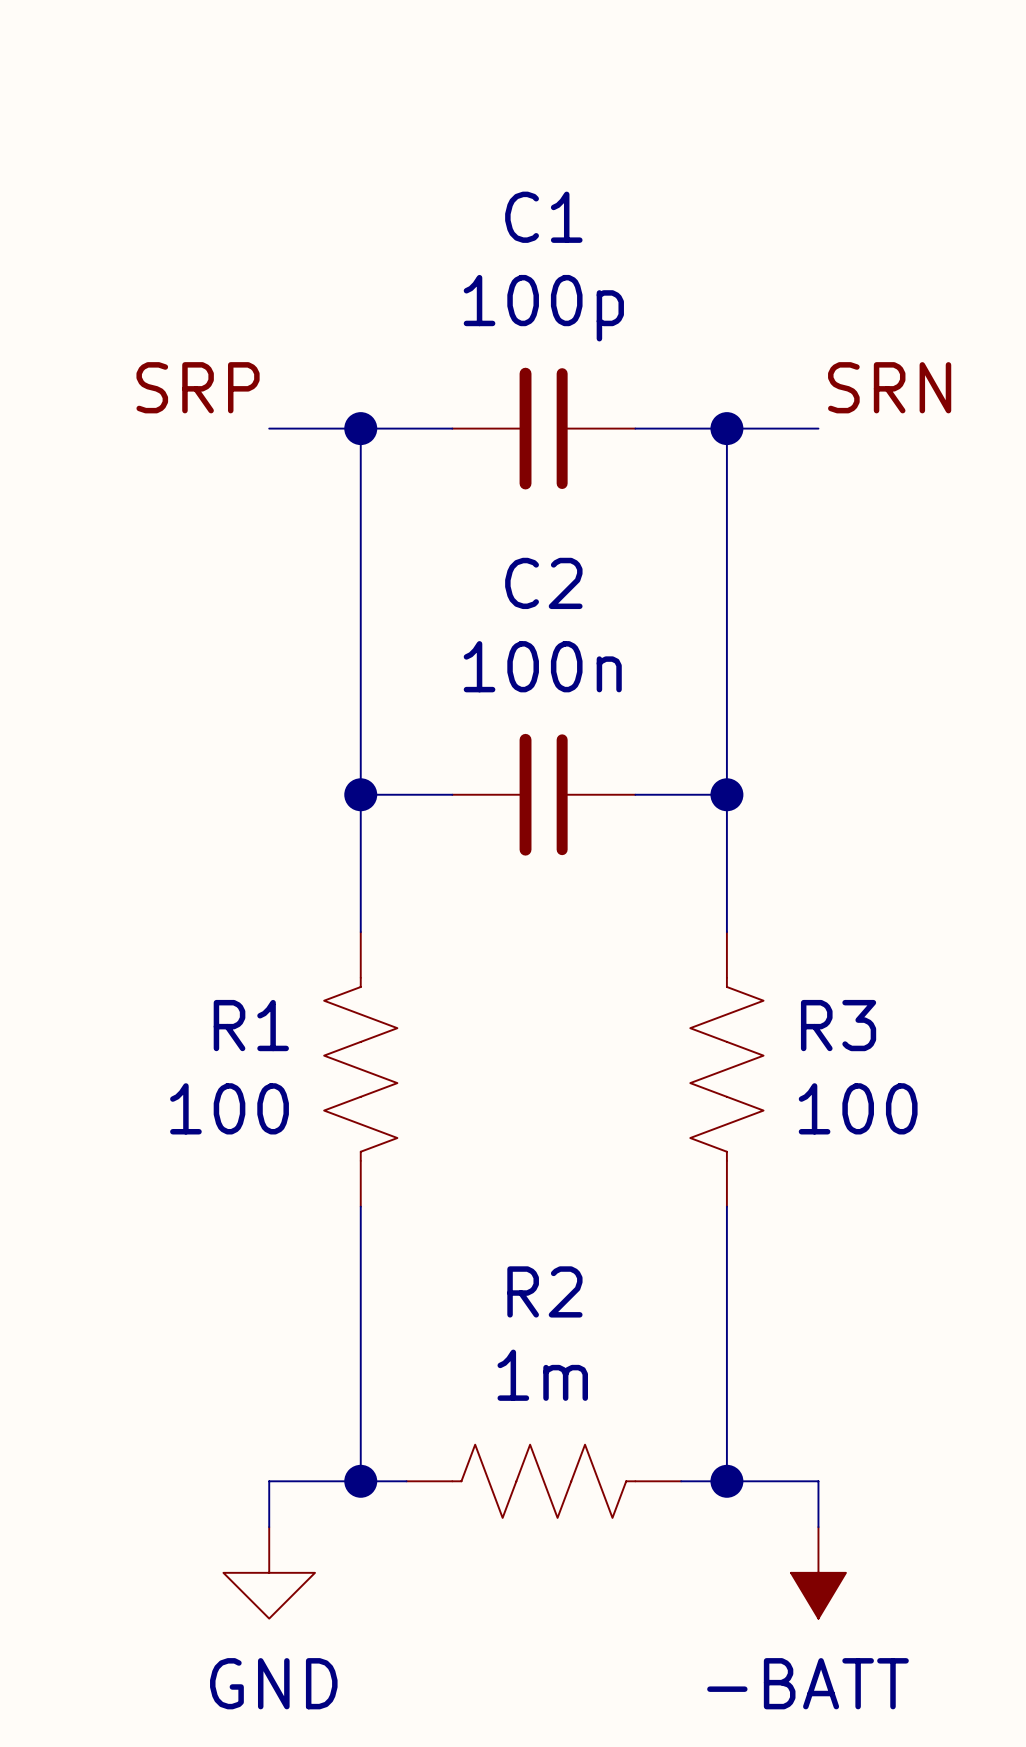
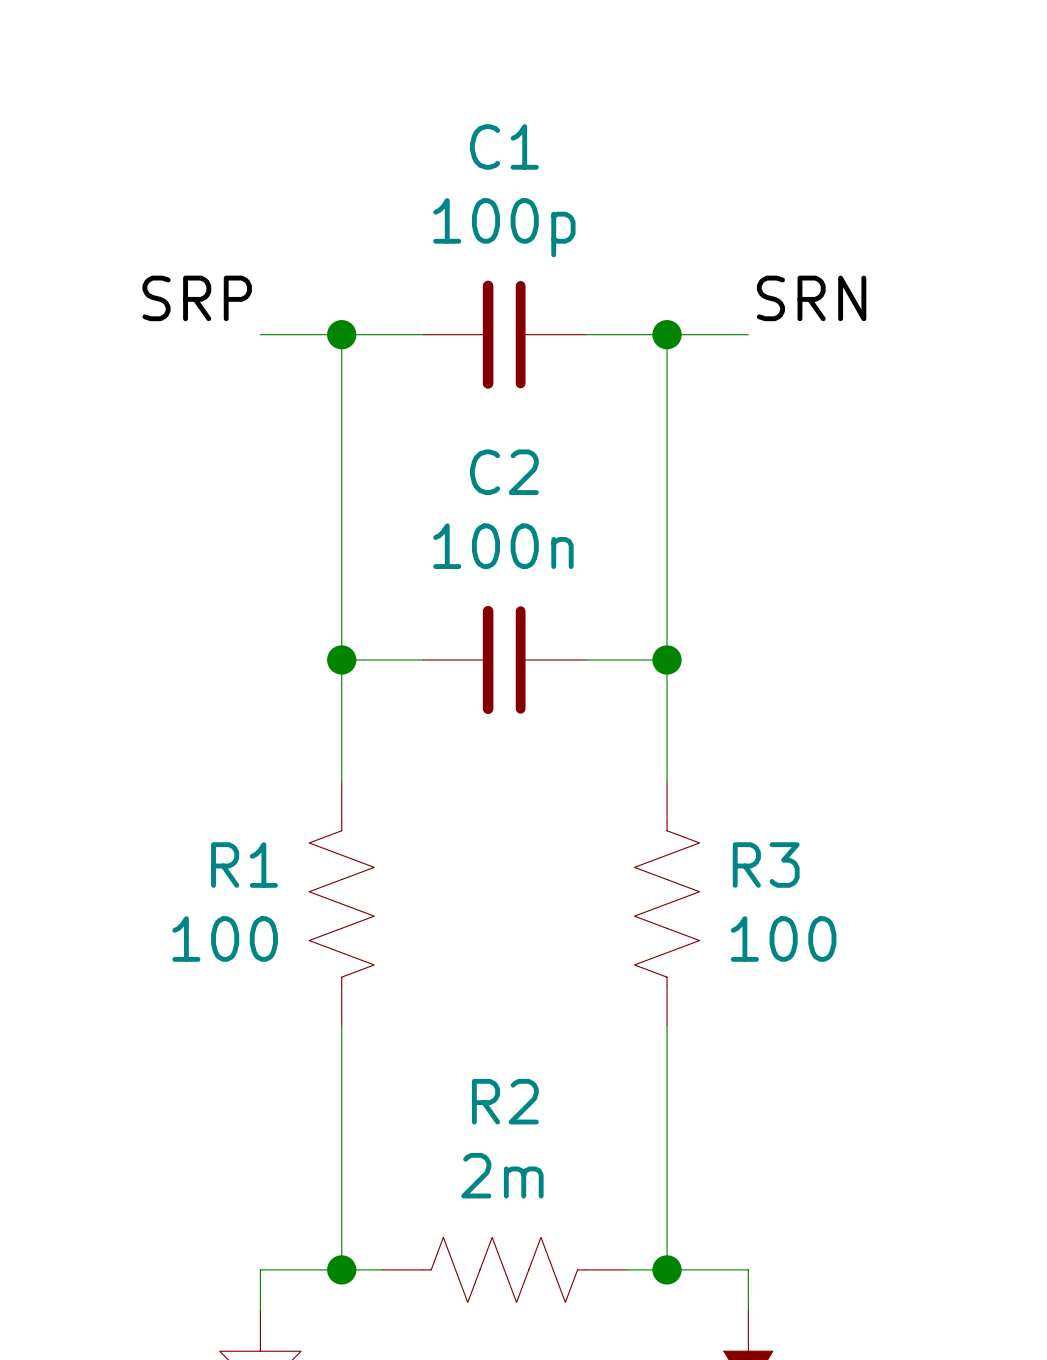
R2 value: 1m (542, 1375) -> 2m (502, 1175)

